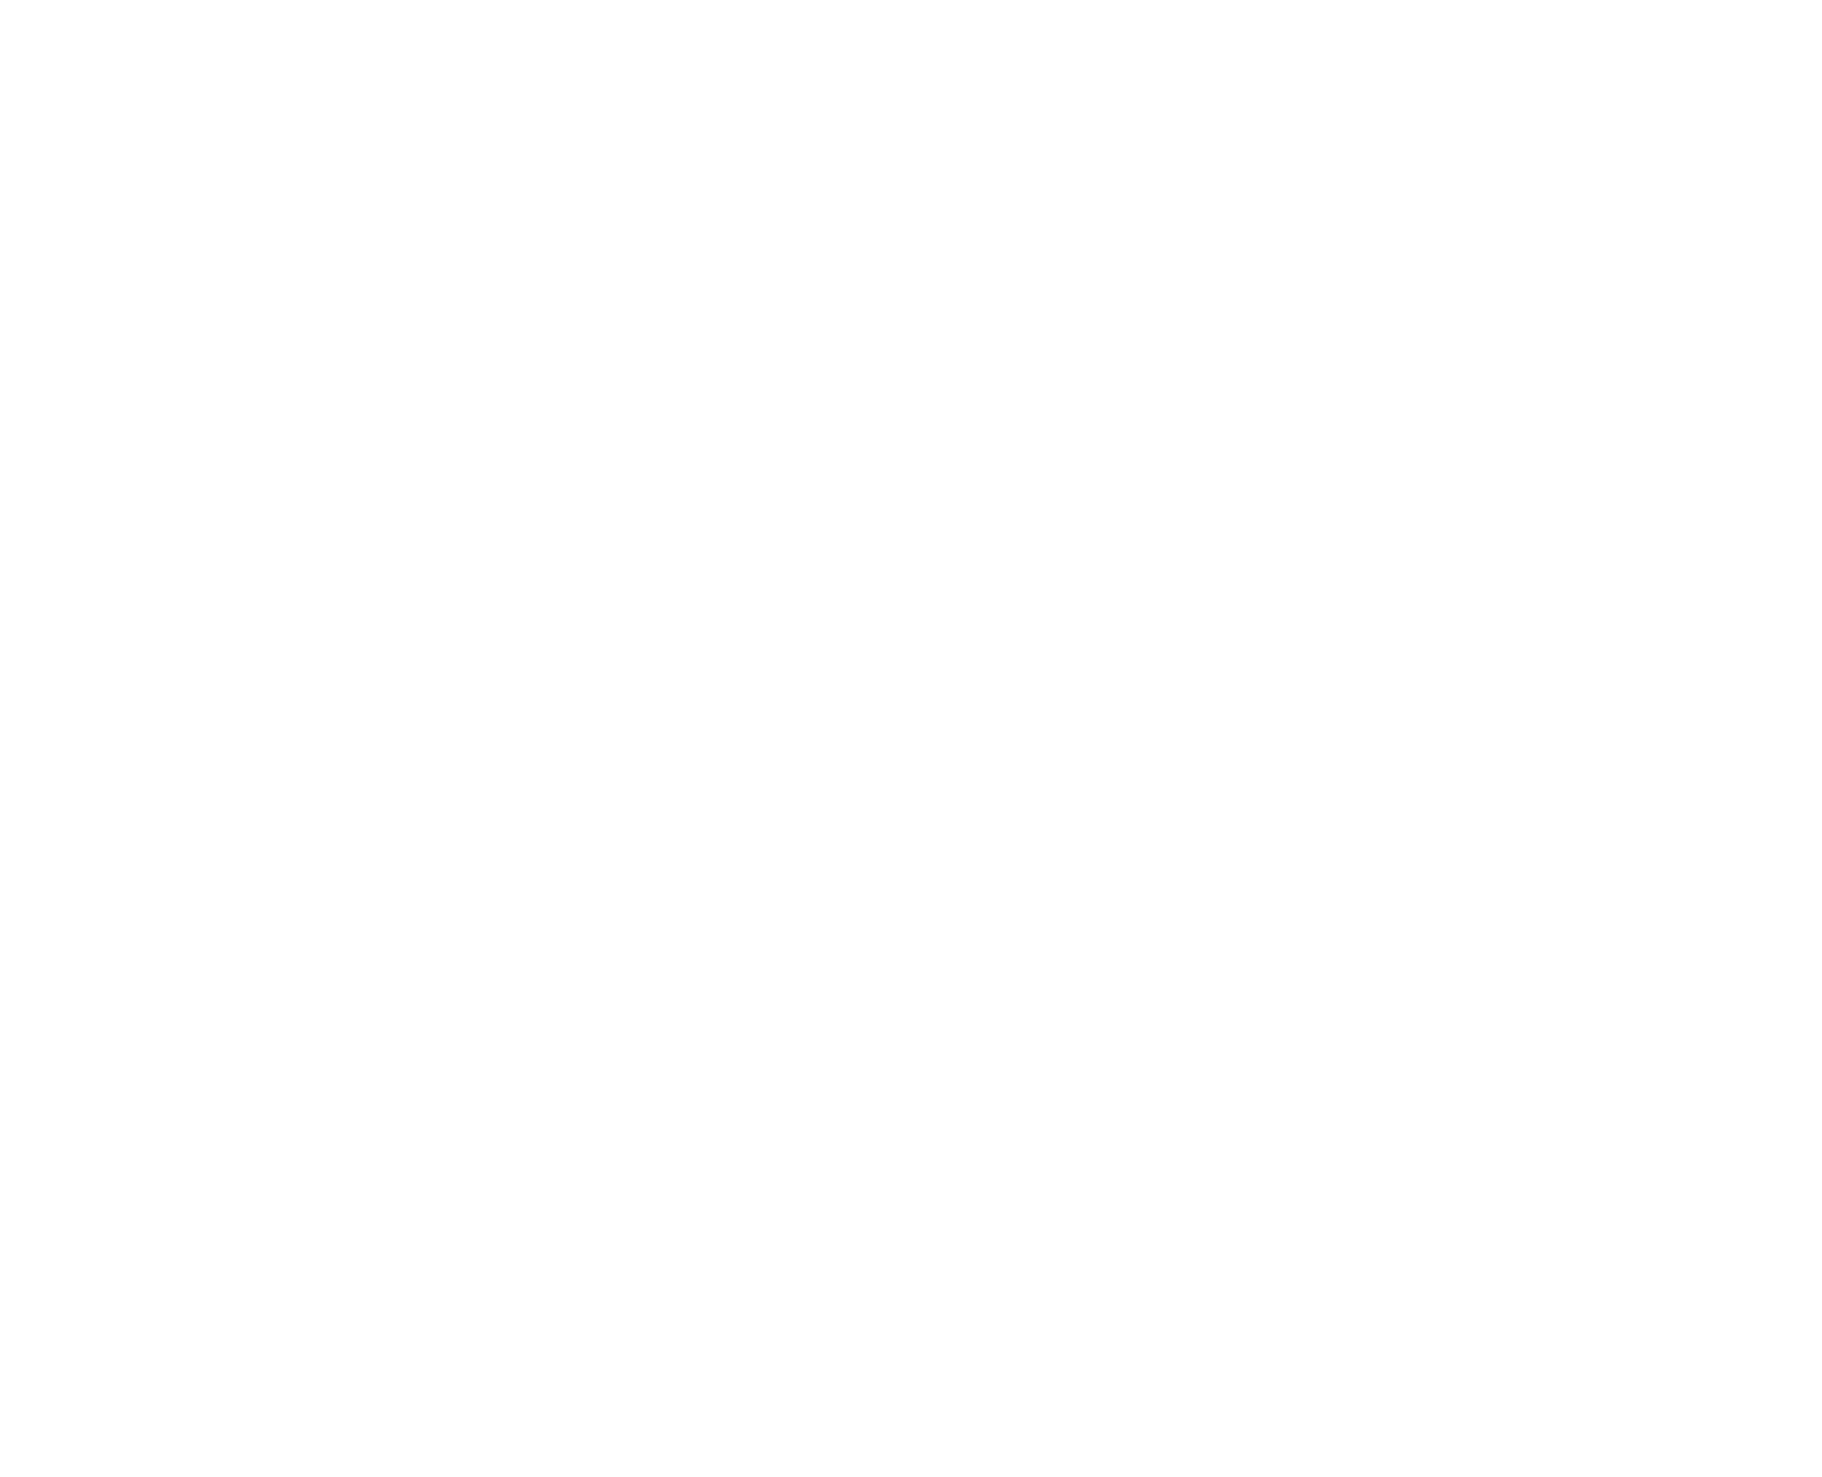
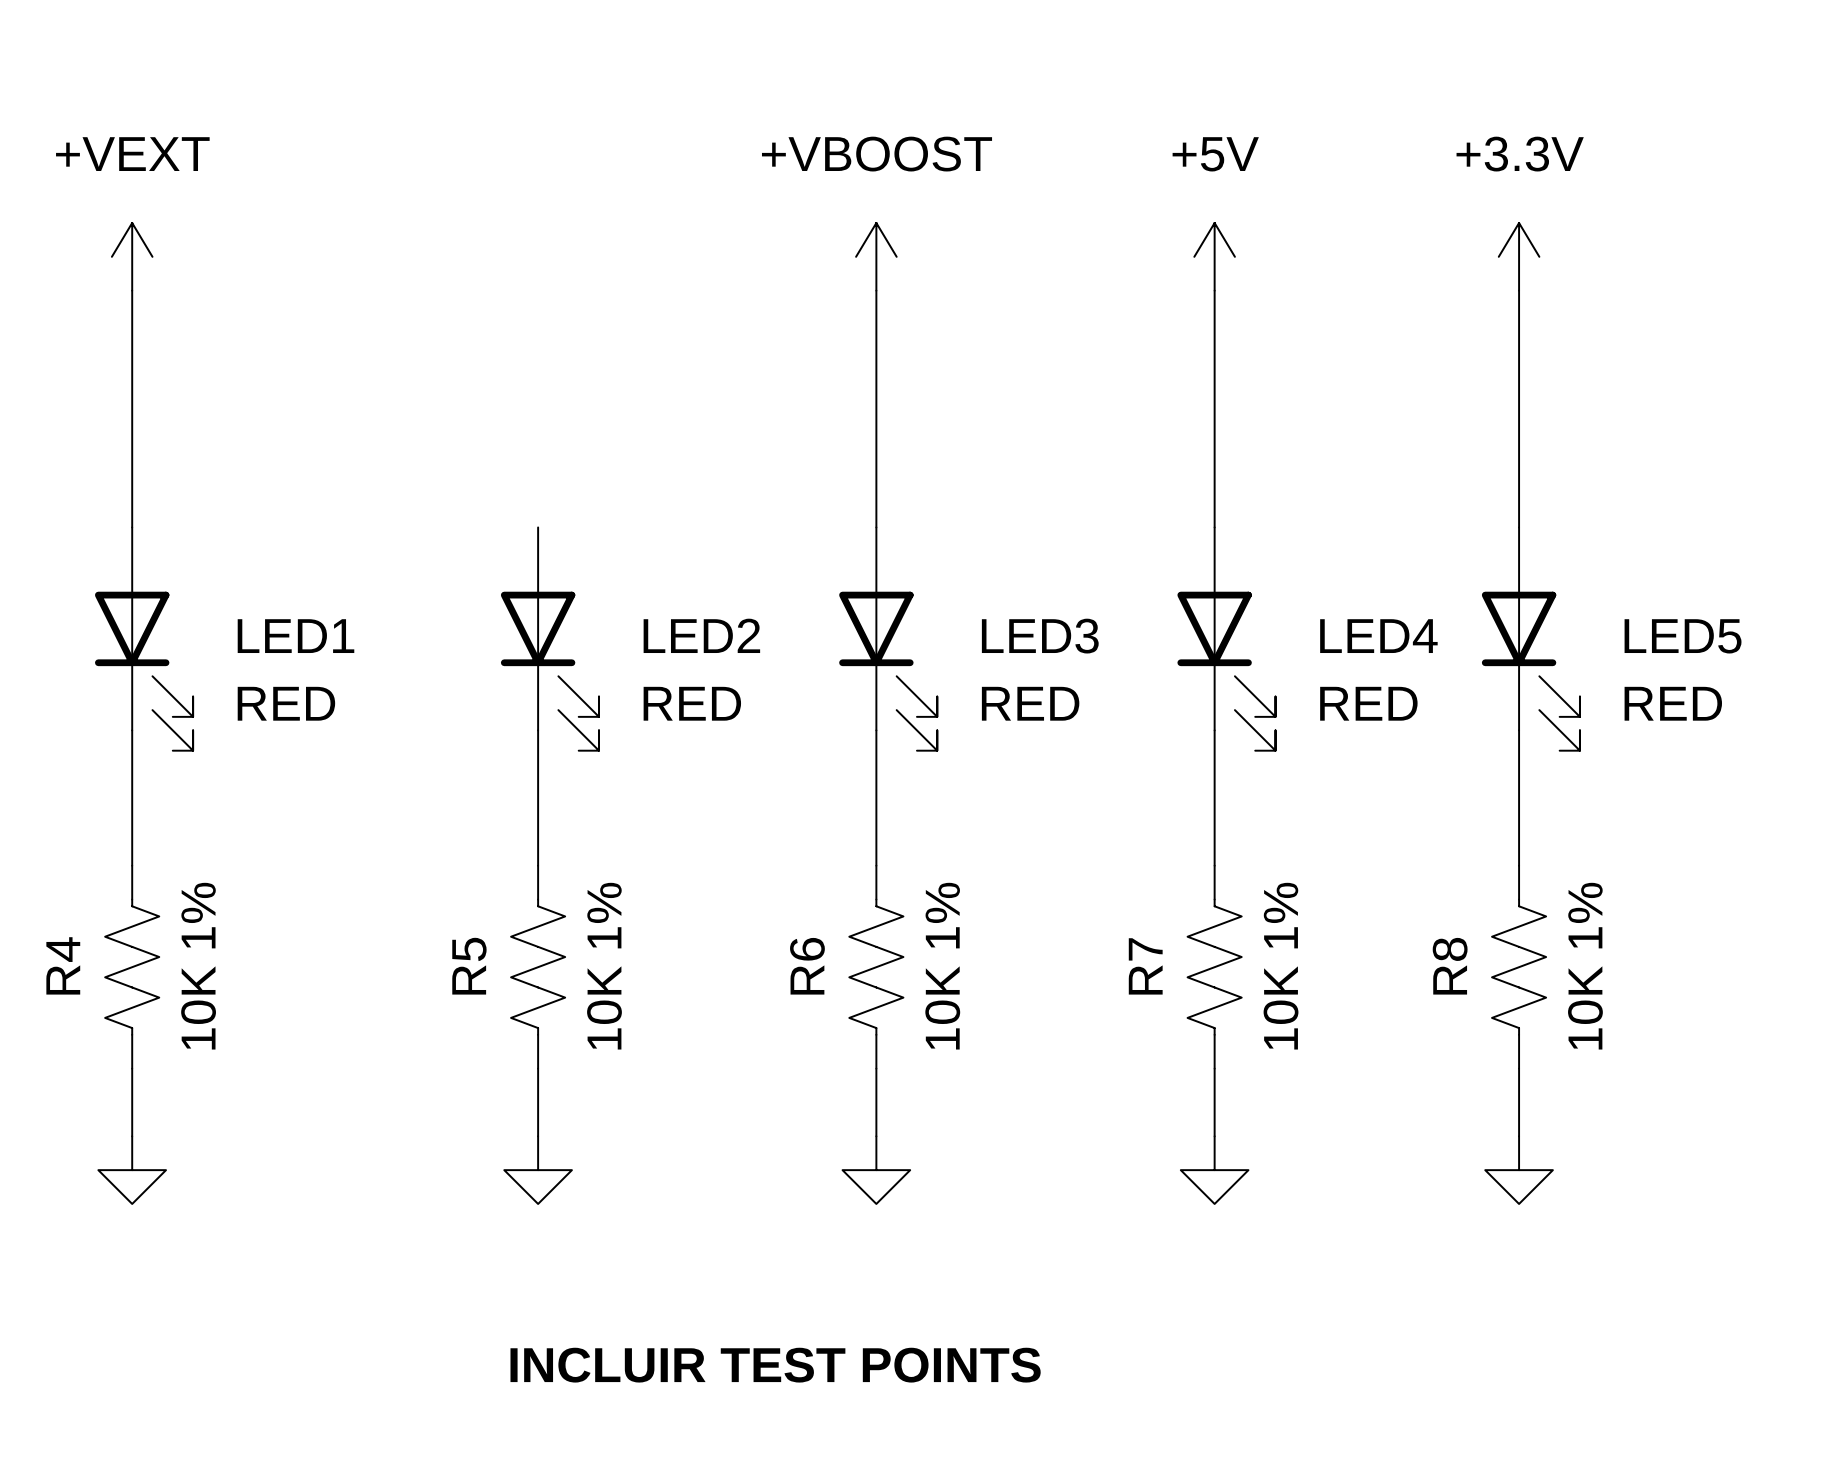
power symbol: none -> +VEXT (132, 256)
power symbol: none -> +VBOOST (876, 256)
power symbol: none -> +5V (1214, 256)
power symbol: none -> +3.3V (1519, 256)
wire: none -> (132, 290) (132, 527)
wire: none -> (876, 290) (876, 527)
wire: none -> (1214, 290) (1214, 527)
wire: none -> (1519, 290) (1519, 527)
LED1: none -> RED (144, 639)
LED2: none -> RED (549, 639)
LED3: none -> RED (888, 639)
LED4: none -> RED (1226, 639)
LED5: none -> RED (1530, 639)
wire: none -> (132, 730) (132, 865)
wire: none -> (538, 730) (538, 865)
wire: none -> (876, 730) (876, 865)
wire: none -> (1214, 730) (1214, 865)
wire: none -> (1519, 730) (1519, 865)
R4: none -> 10K 1% (132, 967)
R5: none -> 10K 1% (538, 967)
R6: none -> 10K 1% (876, 967)
R7: none -> 10K 1% (1214, 967)
R8: none -> 10K 1% (1519, 967)
wire: none -> (132, 1068) (132, 1136)
wire: none -> (538, 1068) (538, 1136)
wire: none -> (876, 1068) (876, 1136)
wire: none -> (1214, 1068) (1214, 1136)
wire: none -> (1519, 1068) (1519, 1136)
power symbol: none -> (132, 1170)
power symbol: none -> (538, 1170)
power symbol: none -> (876, 1170)
power symbol: none -> (1214, 1170)
power symbol: none -> (1519, 1170)
text: none -> INCLUIR TEST POINTS (775, 1365)

